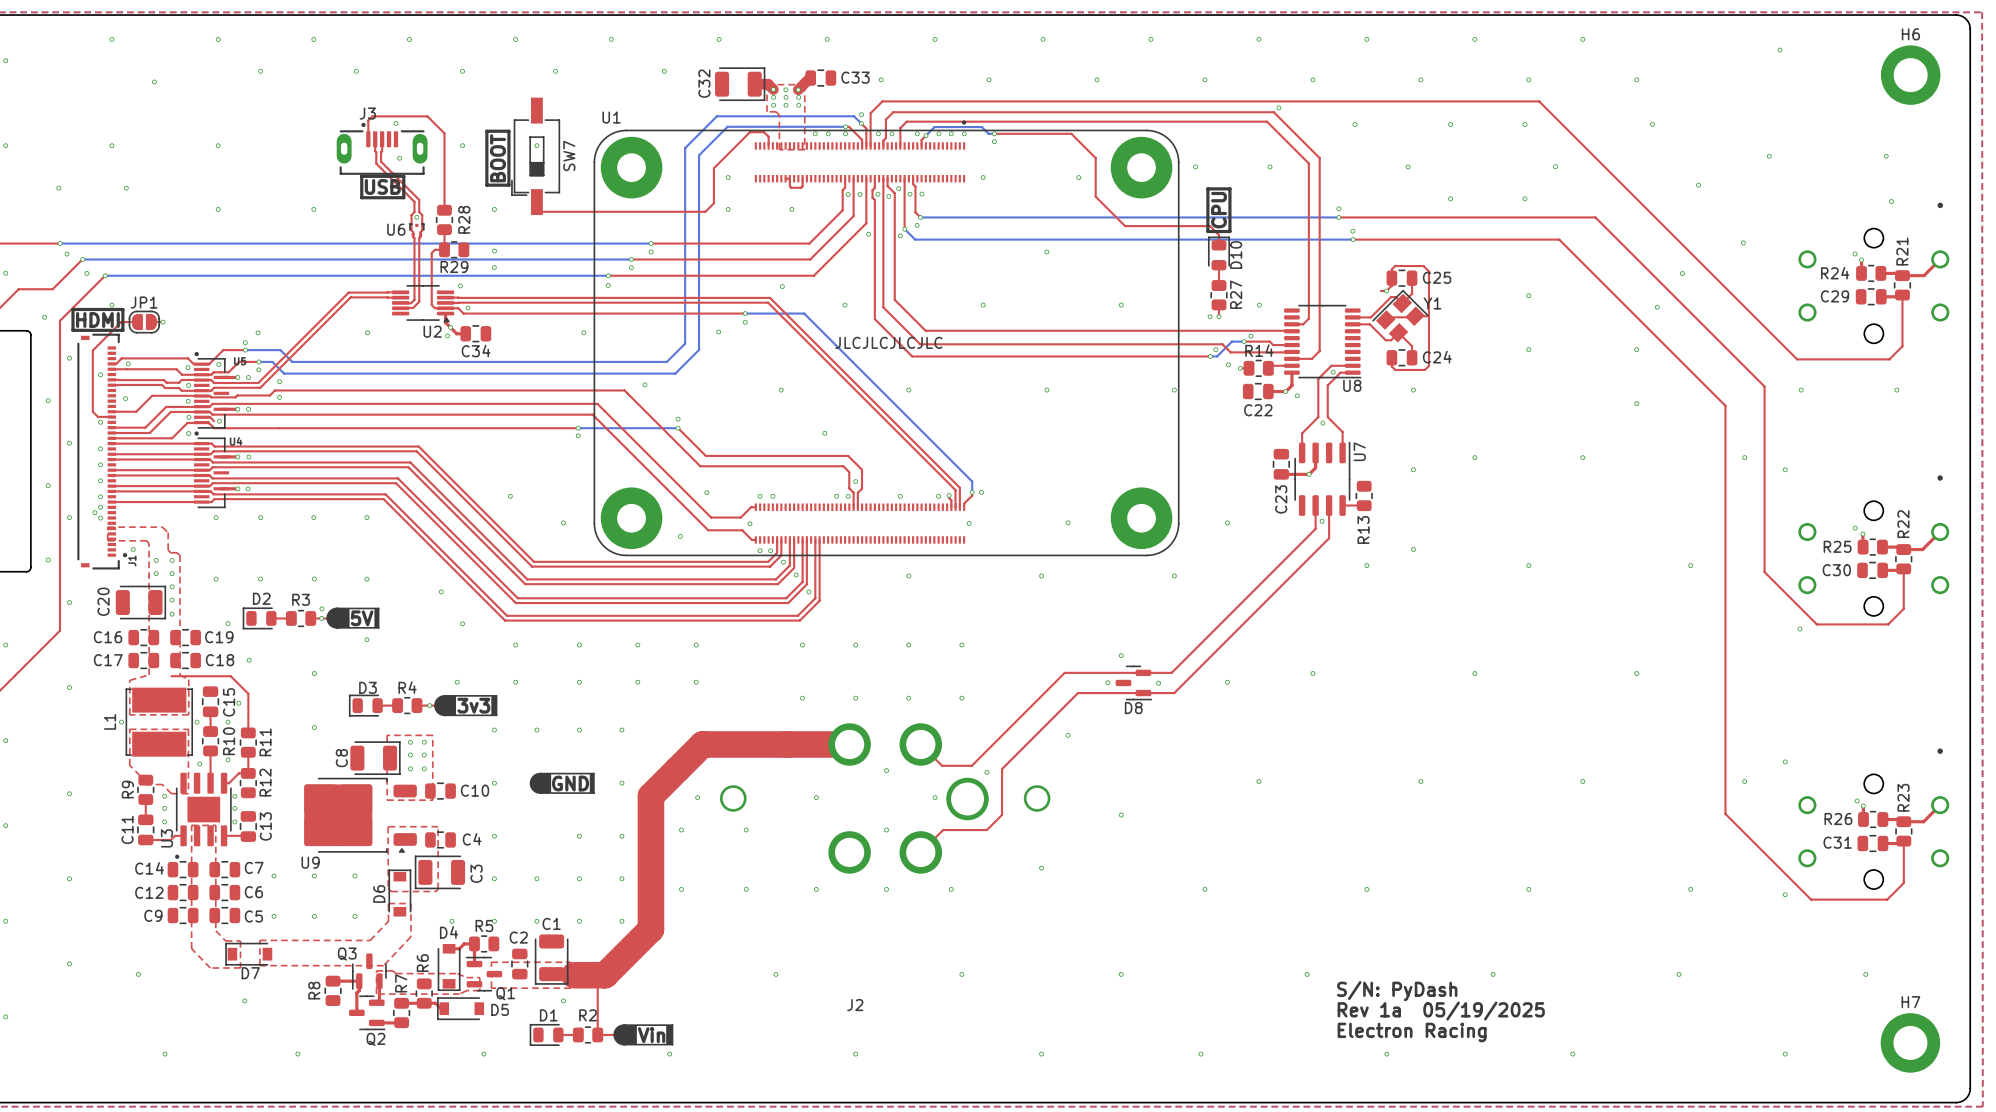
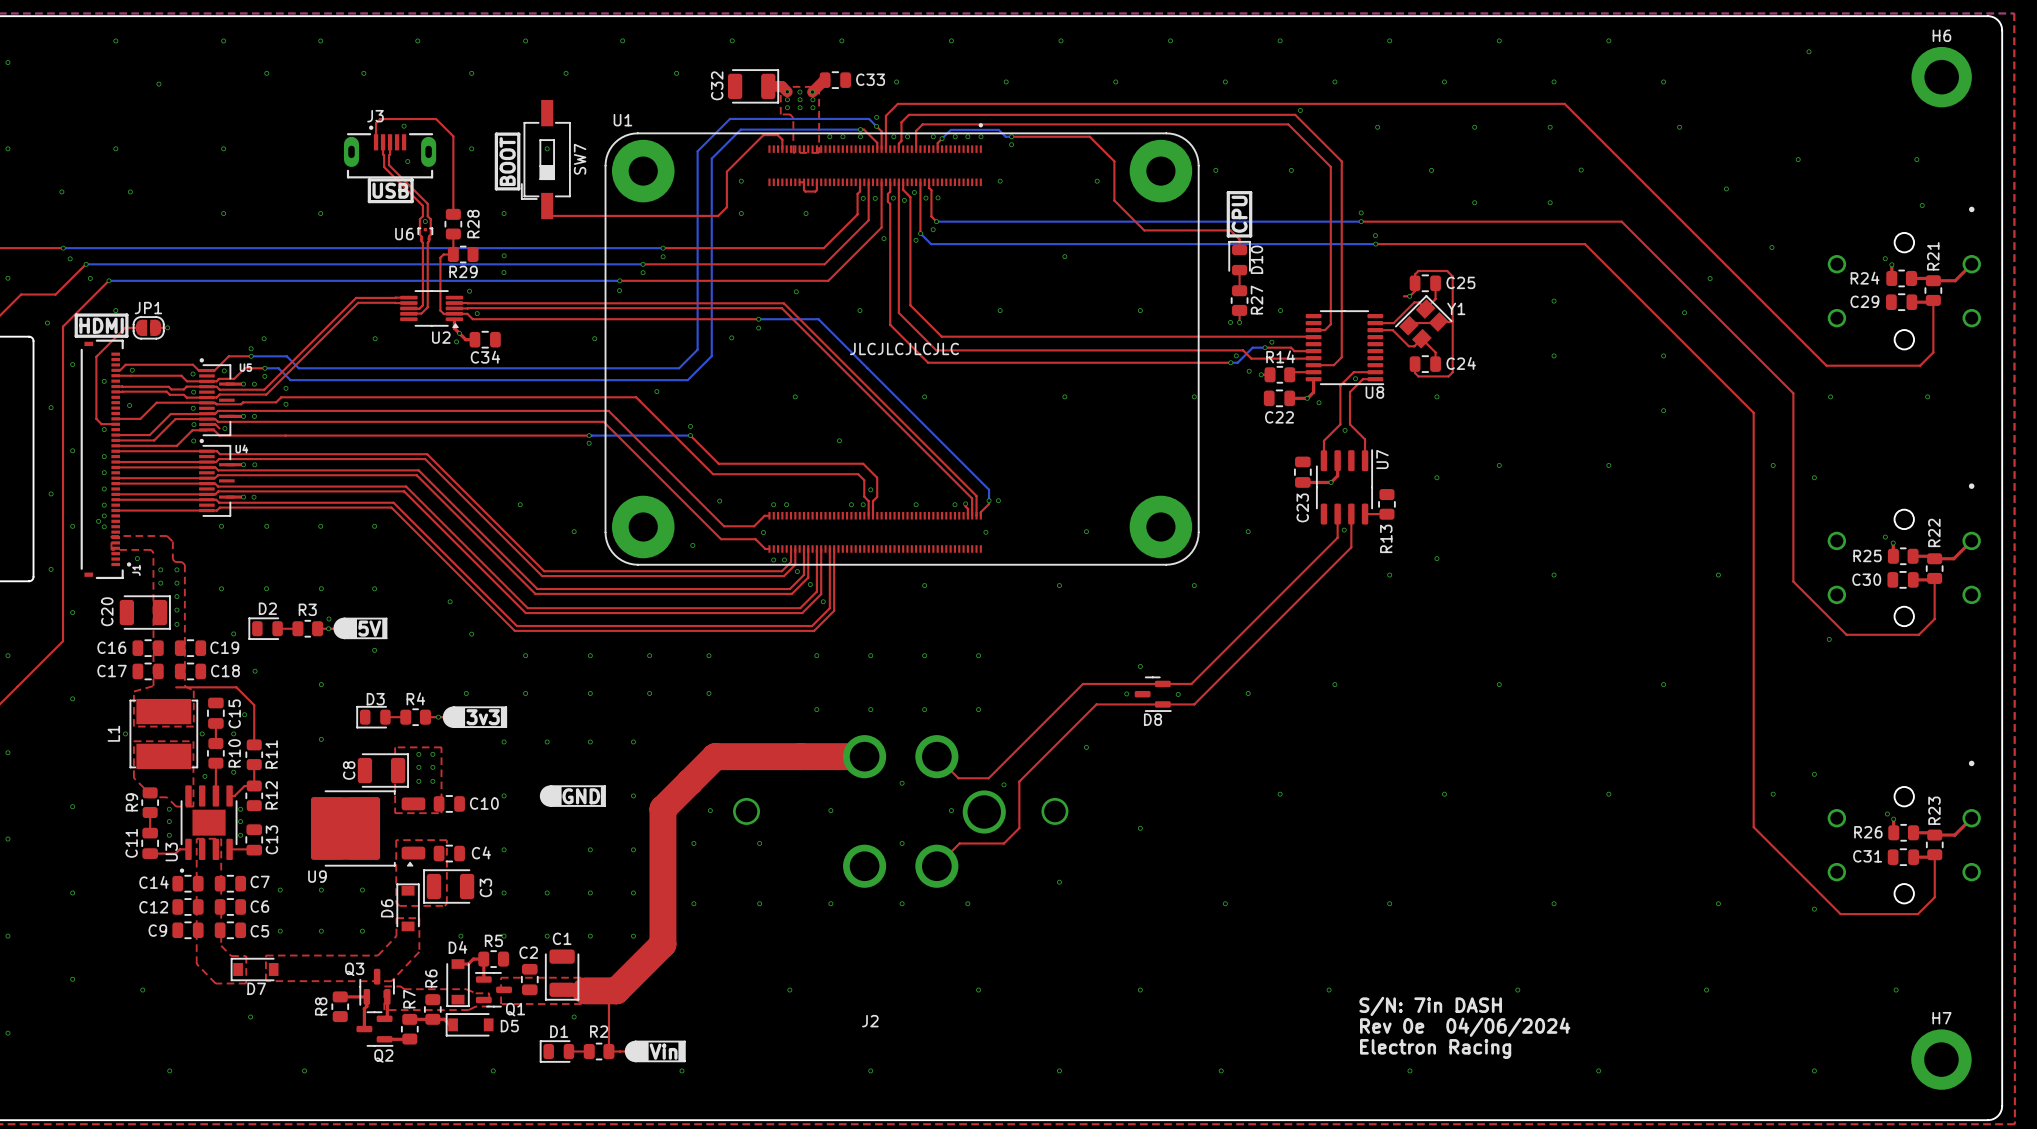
text: S/N: PyDash (1397, 991) -> S/N: 7in DASH (1430, 1006)
text: Rev 1a 05/19/2025 (1441, 1011) -> Rev 0e 04/06/2024 (1465, 1027)

